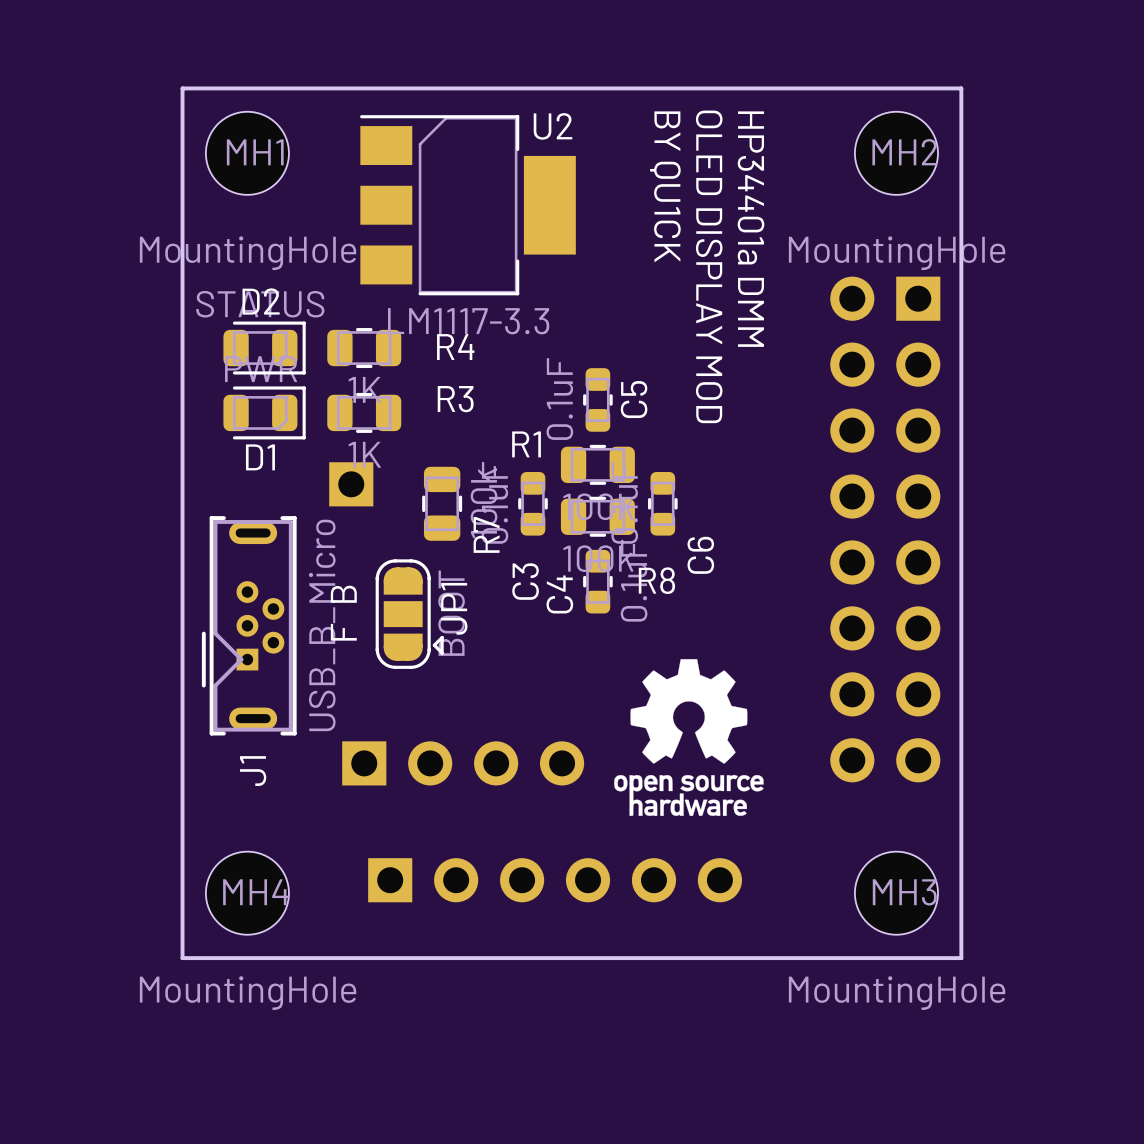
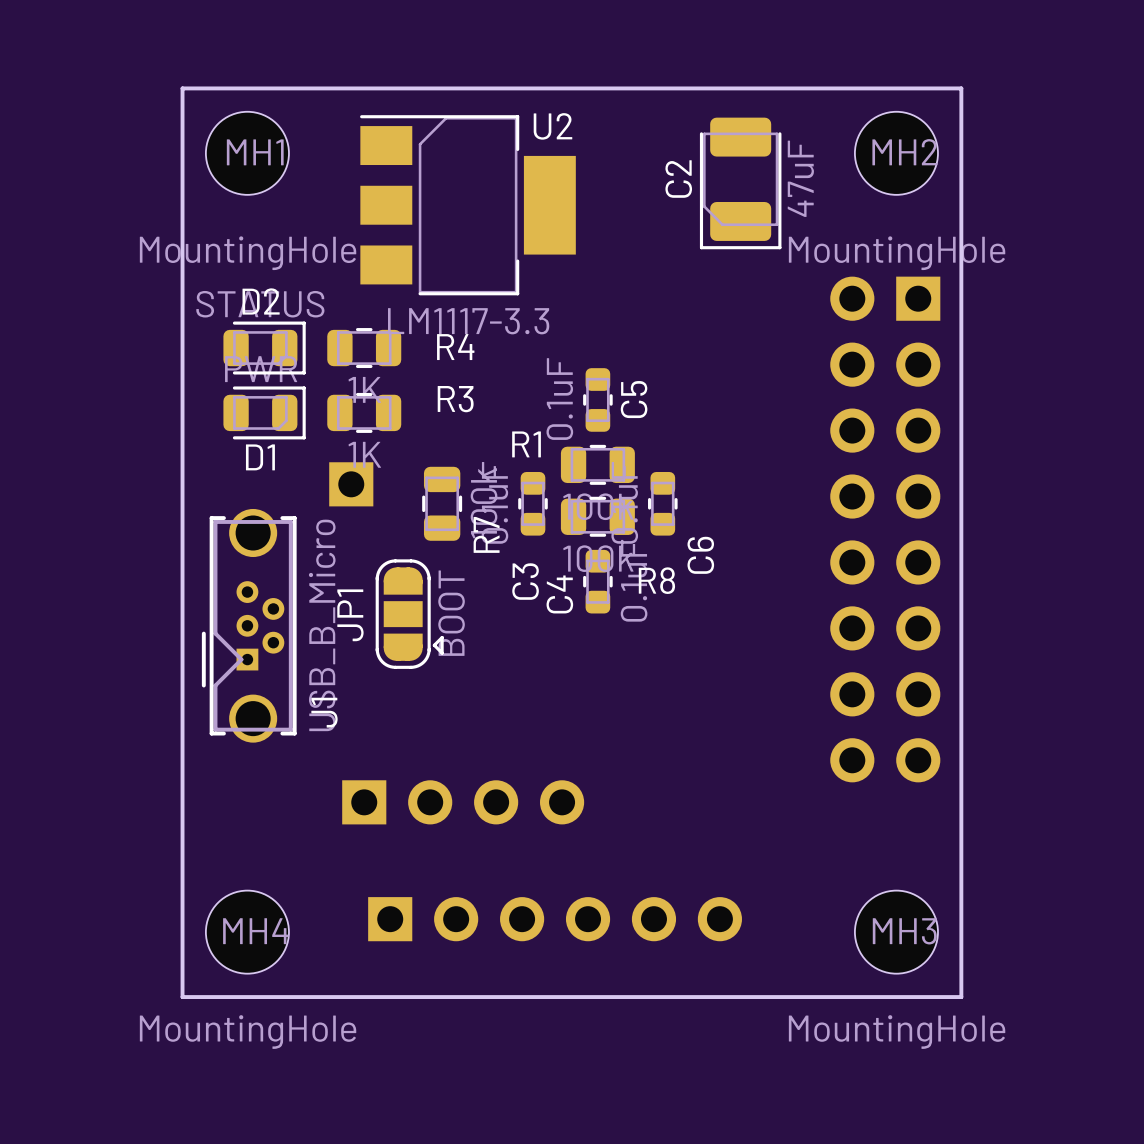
C2: none -> 47uF (740, 183)
text: BY QU1CK (665, 186) -> none
text: HP34401a DMM (750, 229) -> none
text: OLED DISPLAY MOD (709, 266) -> none
J1 footprint: [201, 516, 297, 736] -> [201, 508, 297, 743]
text: B (343, 594) -> none
JP1 name position: JP1 (454, 608) -> JP1 (350, 615)
text: F (343, 632) -> none
drawing: [614, 659, 764, 816] -> none
part position: (463, 763) -> (463, 802)
J1 name position: J1 (253, 771) -> J1 (324, 712)
part position: (555, 880) -> (555, 919)
MH4 position: (247, 893) -> (247, 932)
MH3 position: (896, 893) -> (896, 932)
board edge: (182, 958) (961, 958) -> (182, 958) (182, 997) (961, 997) (961, 958)

